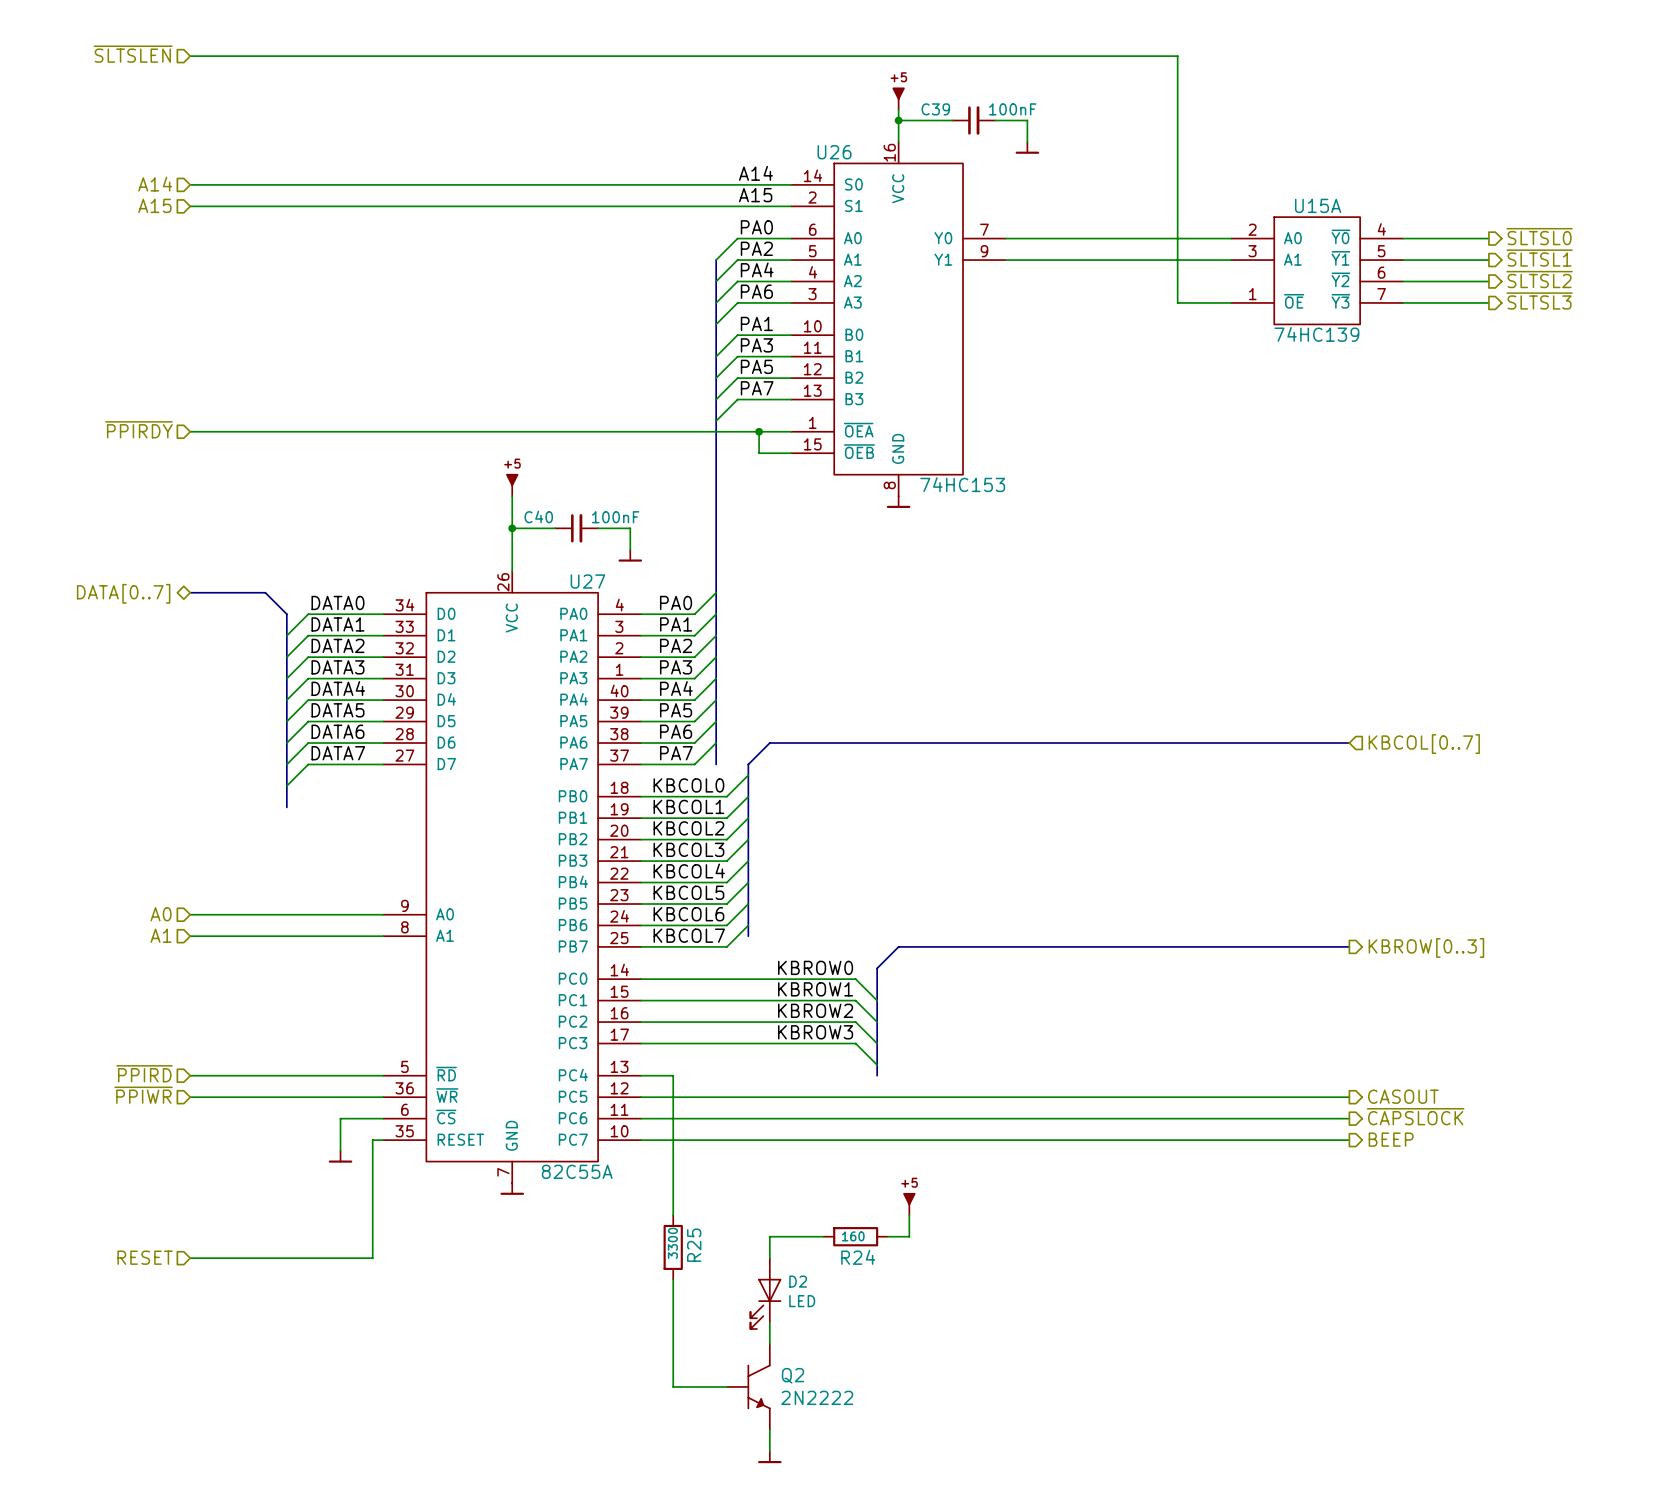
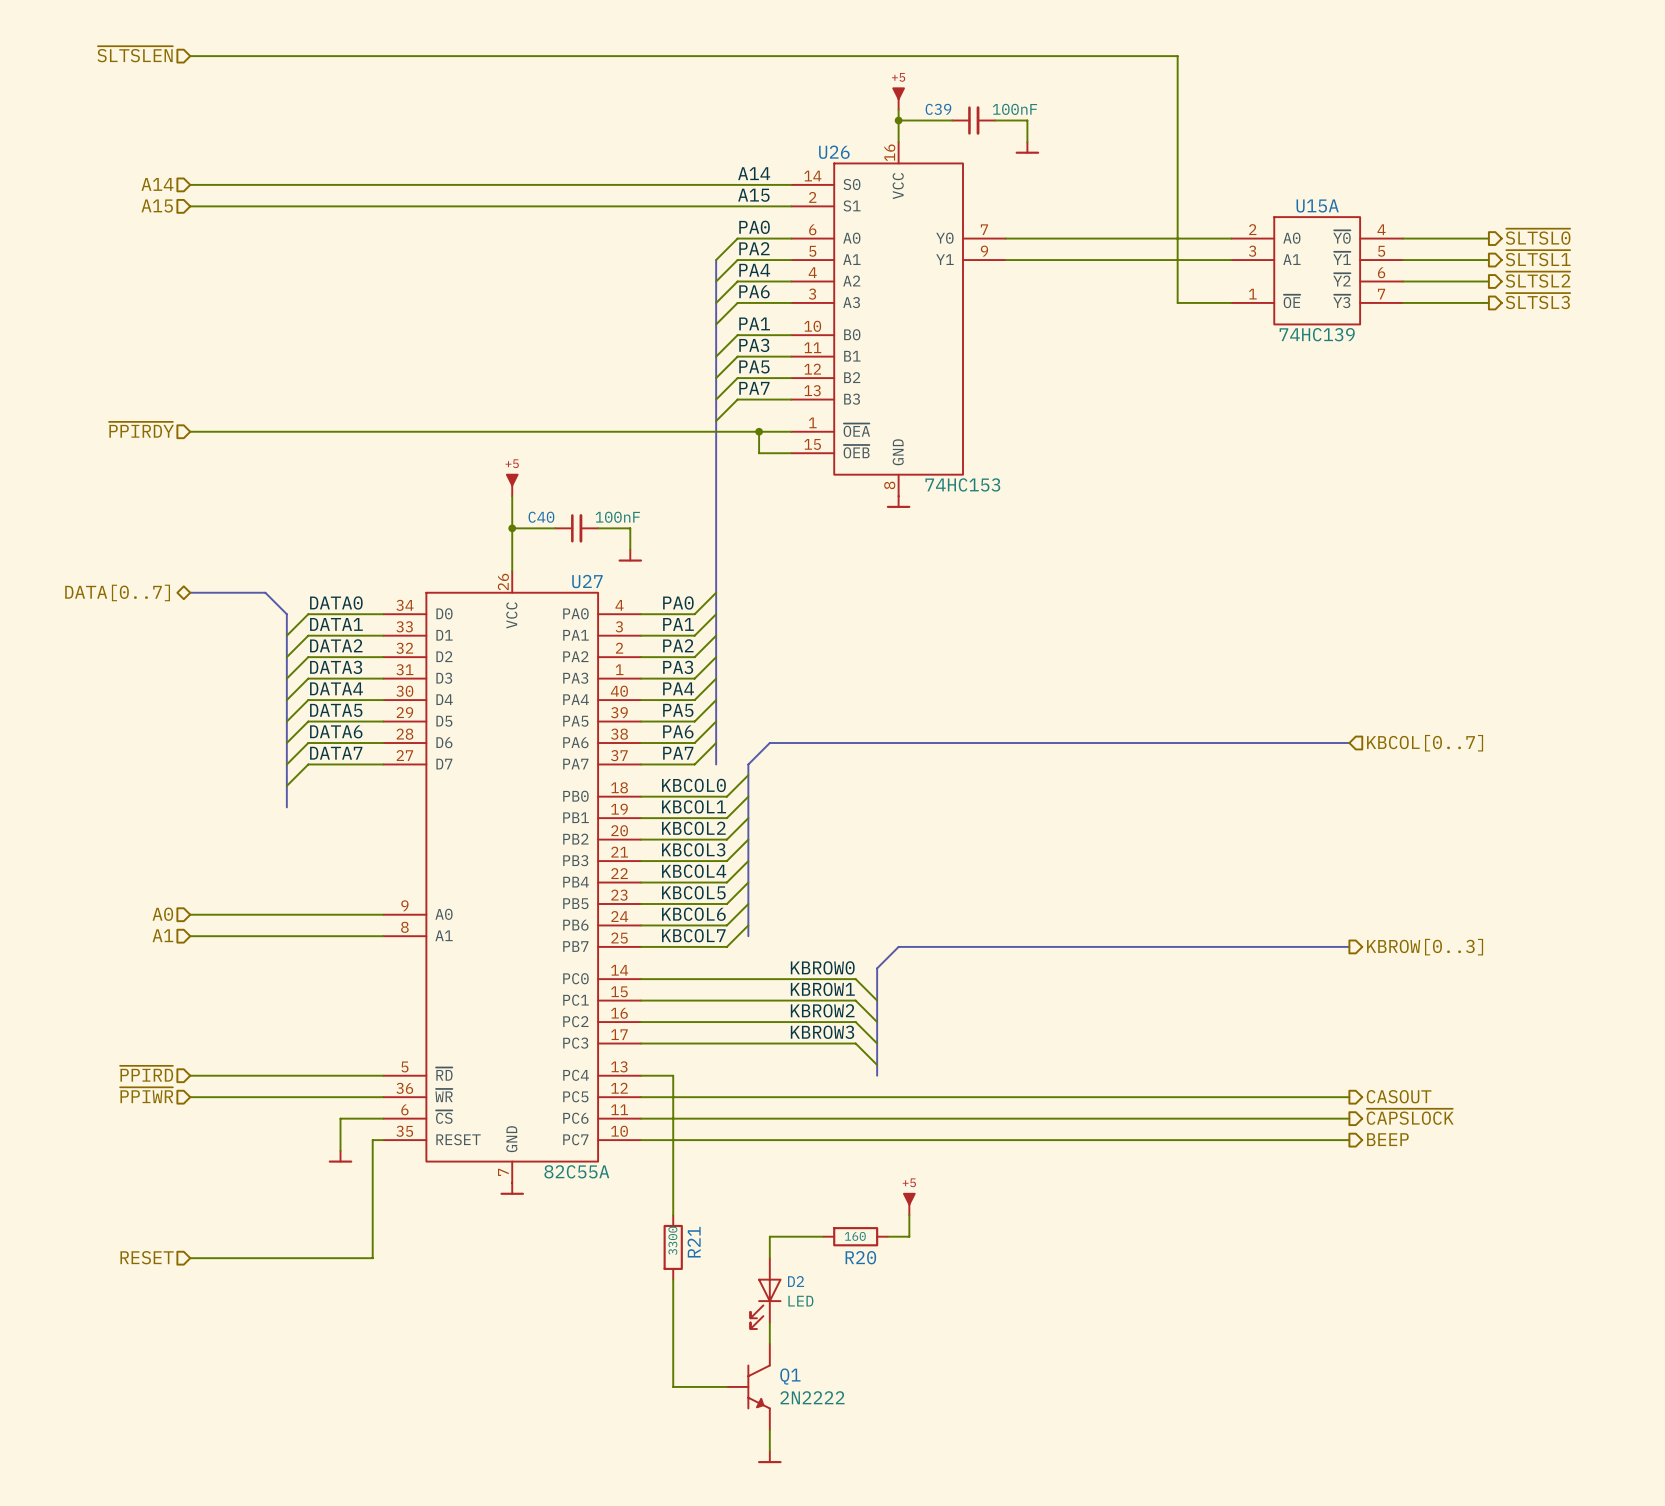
R25 name: R25 (694, 1245) -> R21 (694, 1242)
R24 name: R24 (858, 1257) -> R20 (860, 1257)
Q2 name: Q2 (792, 1375) -> Q1 (790, 1376)

